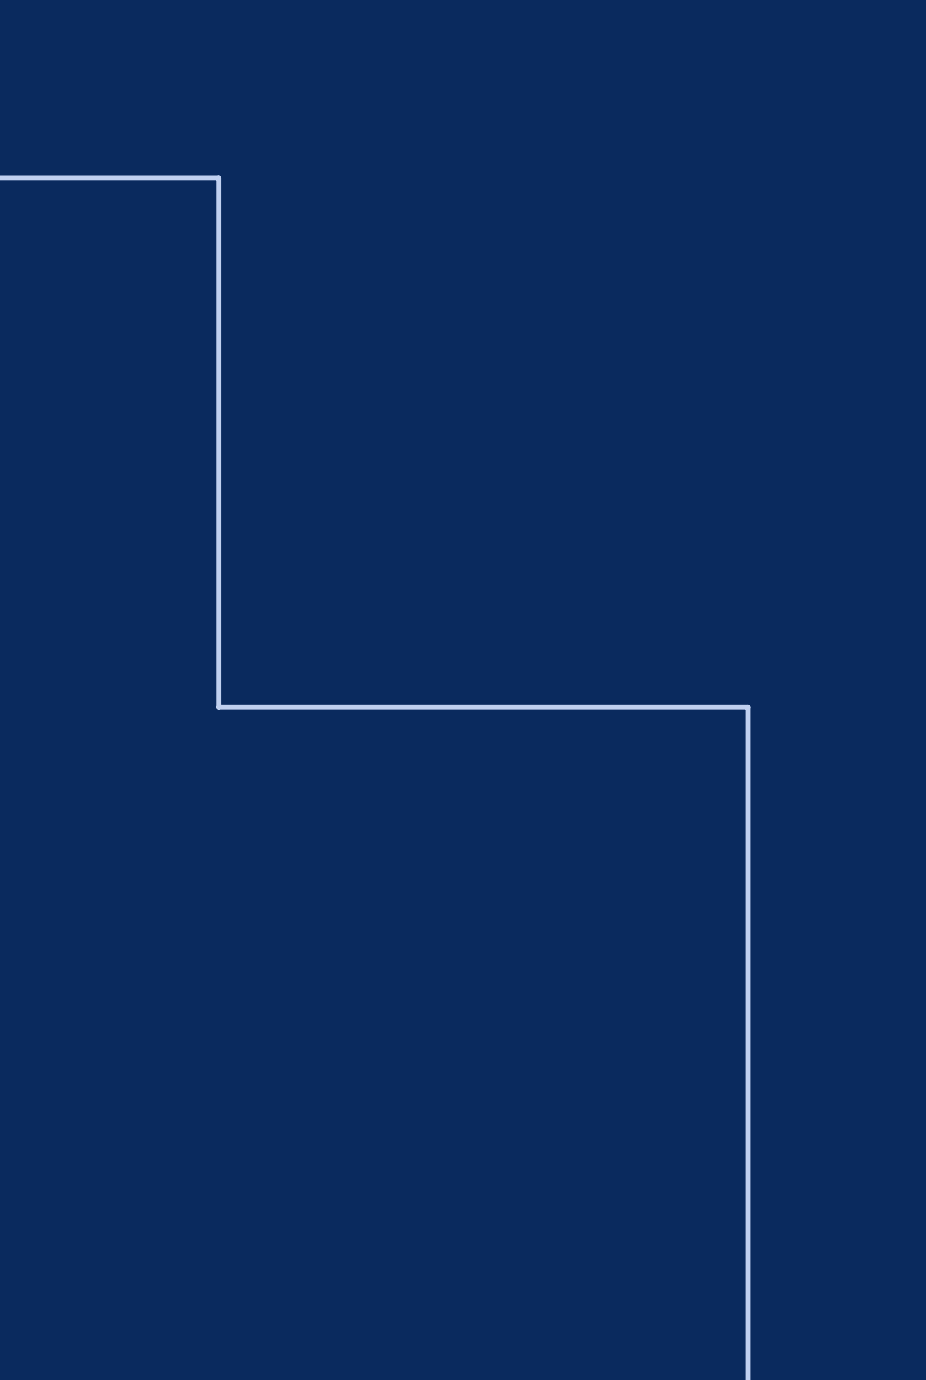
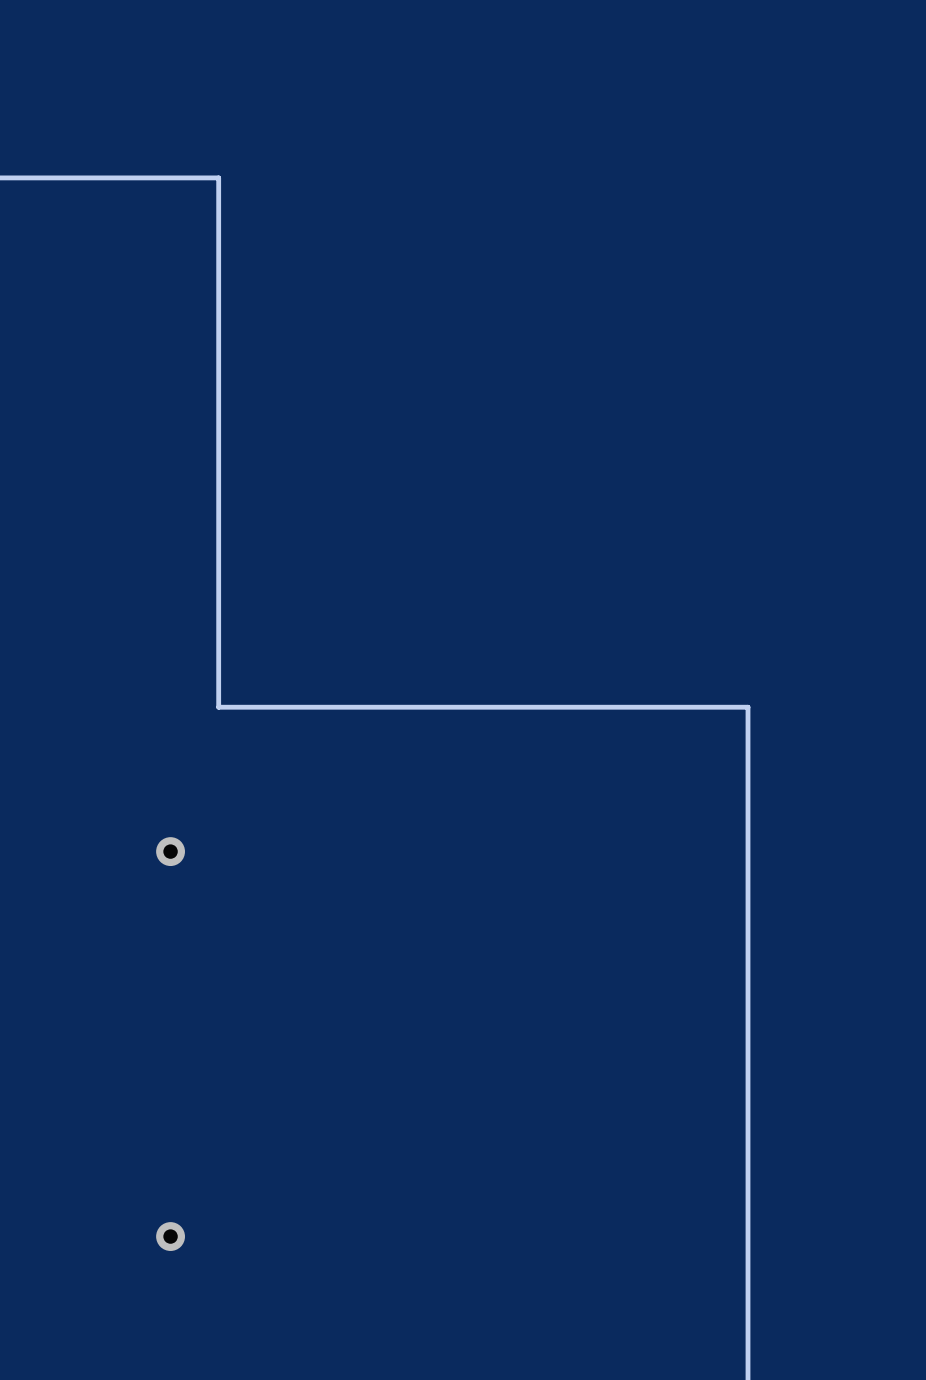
via: none -> (170, 851)
via: none -> (170, 1236)

